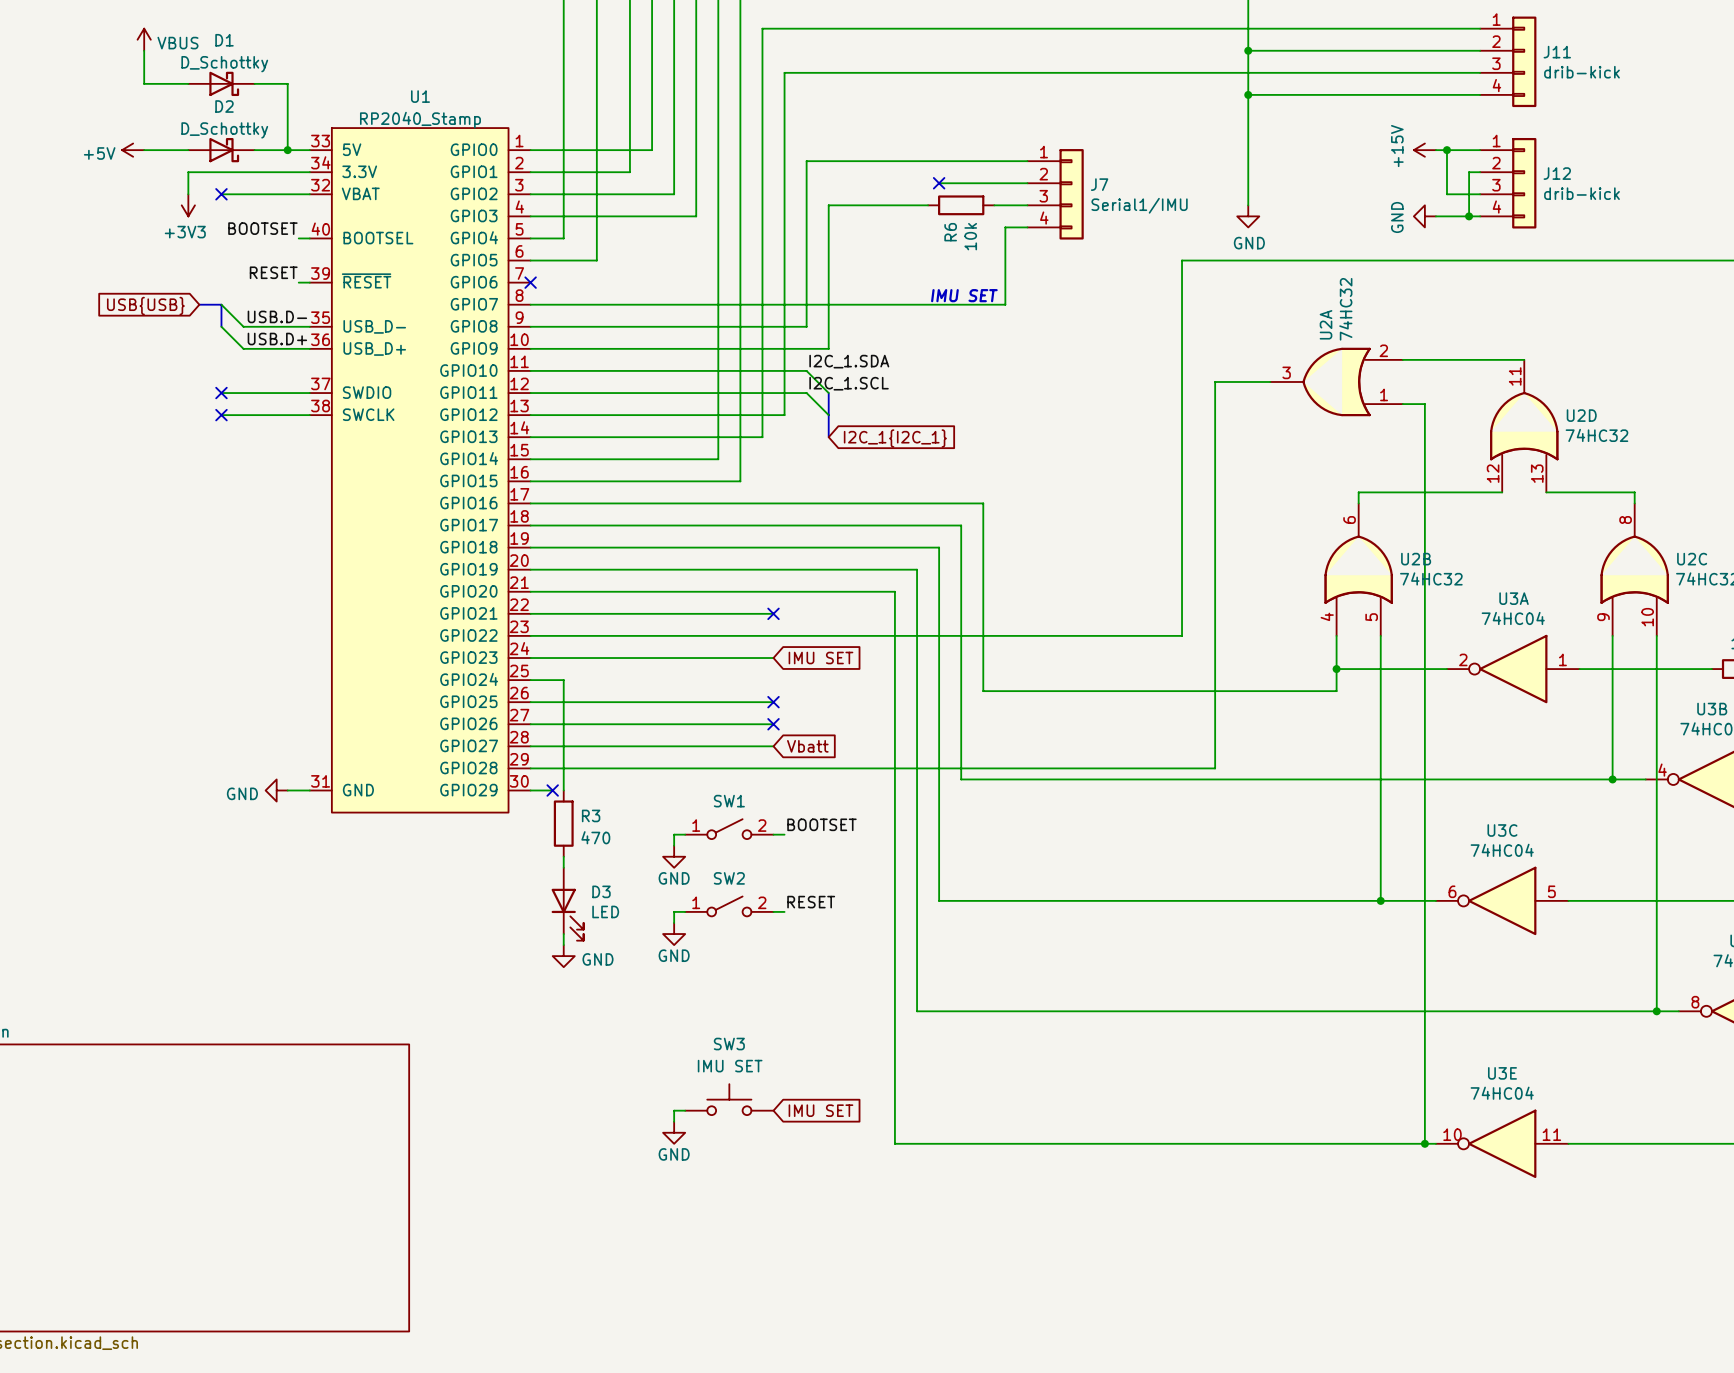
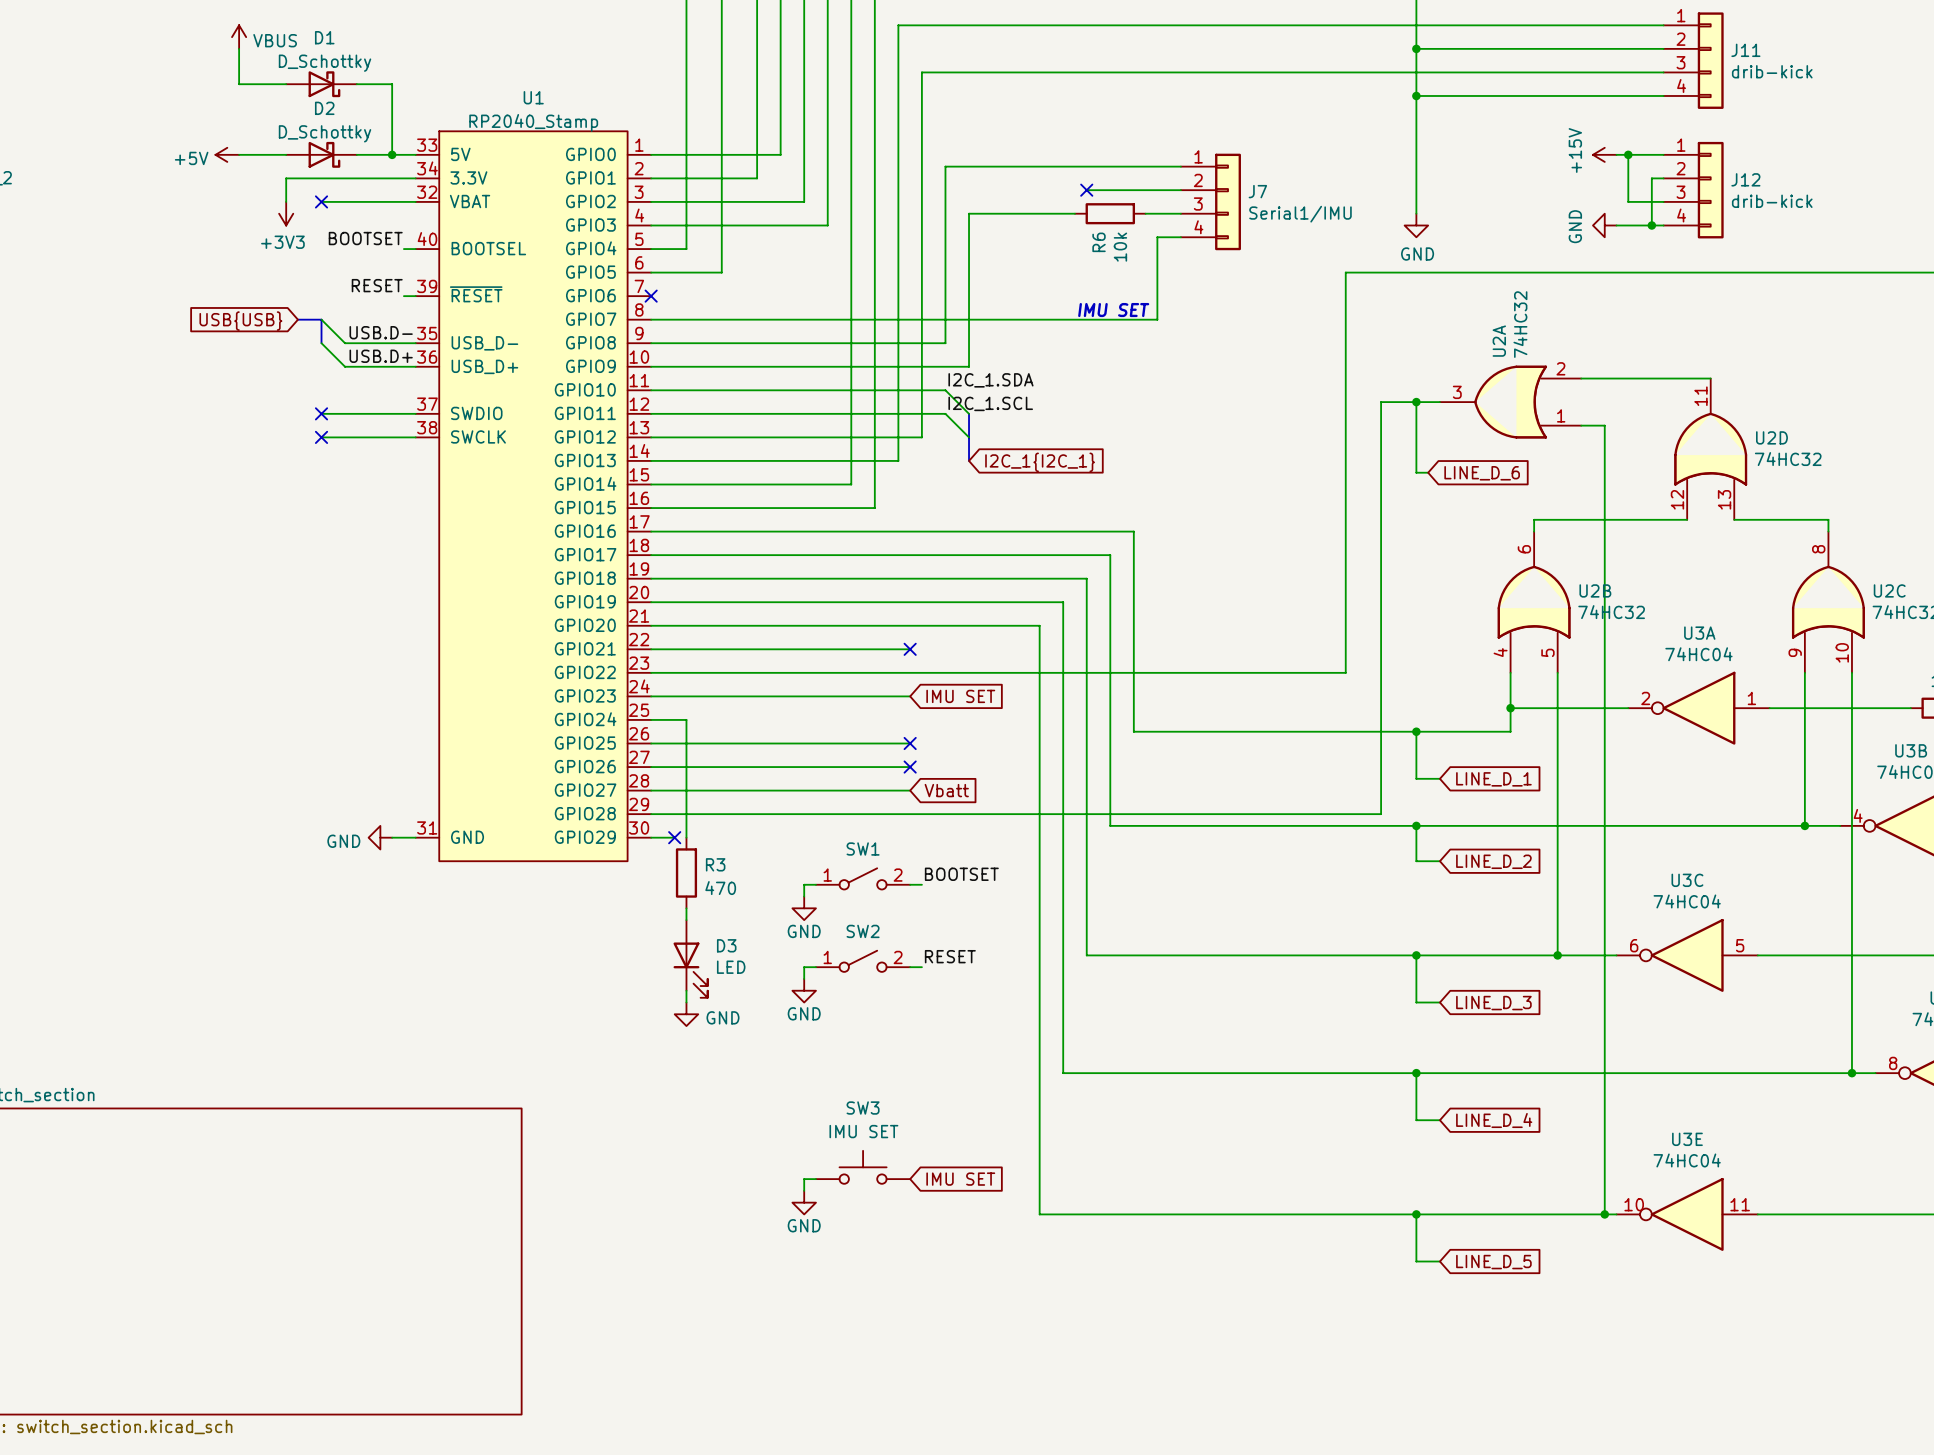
wire: none -> (1416, 402) (1416, 472) (1428, 472)
junction: none -> (1416, 402)
global label: none -> LINE_D_6 (1482, 473)
wire: none -> (1416, 731) (1416, 778) (1439, 778)
junction: none -> (1416, 731)
global label: none -> LINE_D_1 (1493, 779)
wire: none -> (1416, 825) (1416, 861) (1439, 861)
junction: none -> (1416, 825)
global label: none -> LINE_D_2 (1493, 861)
wire: none -> (1416, 955) (1416, 1002) (1439, 1002)
junction: none -> (1416, 955)
global label: none -> LINE_D_3 (1493, 1003)
wire: none -> (1416, 1073) (1416, 1120) (1439, 1120)
junction: none -> (1416, 1073)
global label: none -> LINE_D_4 (1494, 1120)
wire: none -> (1416, 1214) (1416, 1261) (1439, 1261)
junction: none -> (1416, 1214)
global label: none -> LINE_D_5 (1493, 1262)

